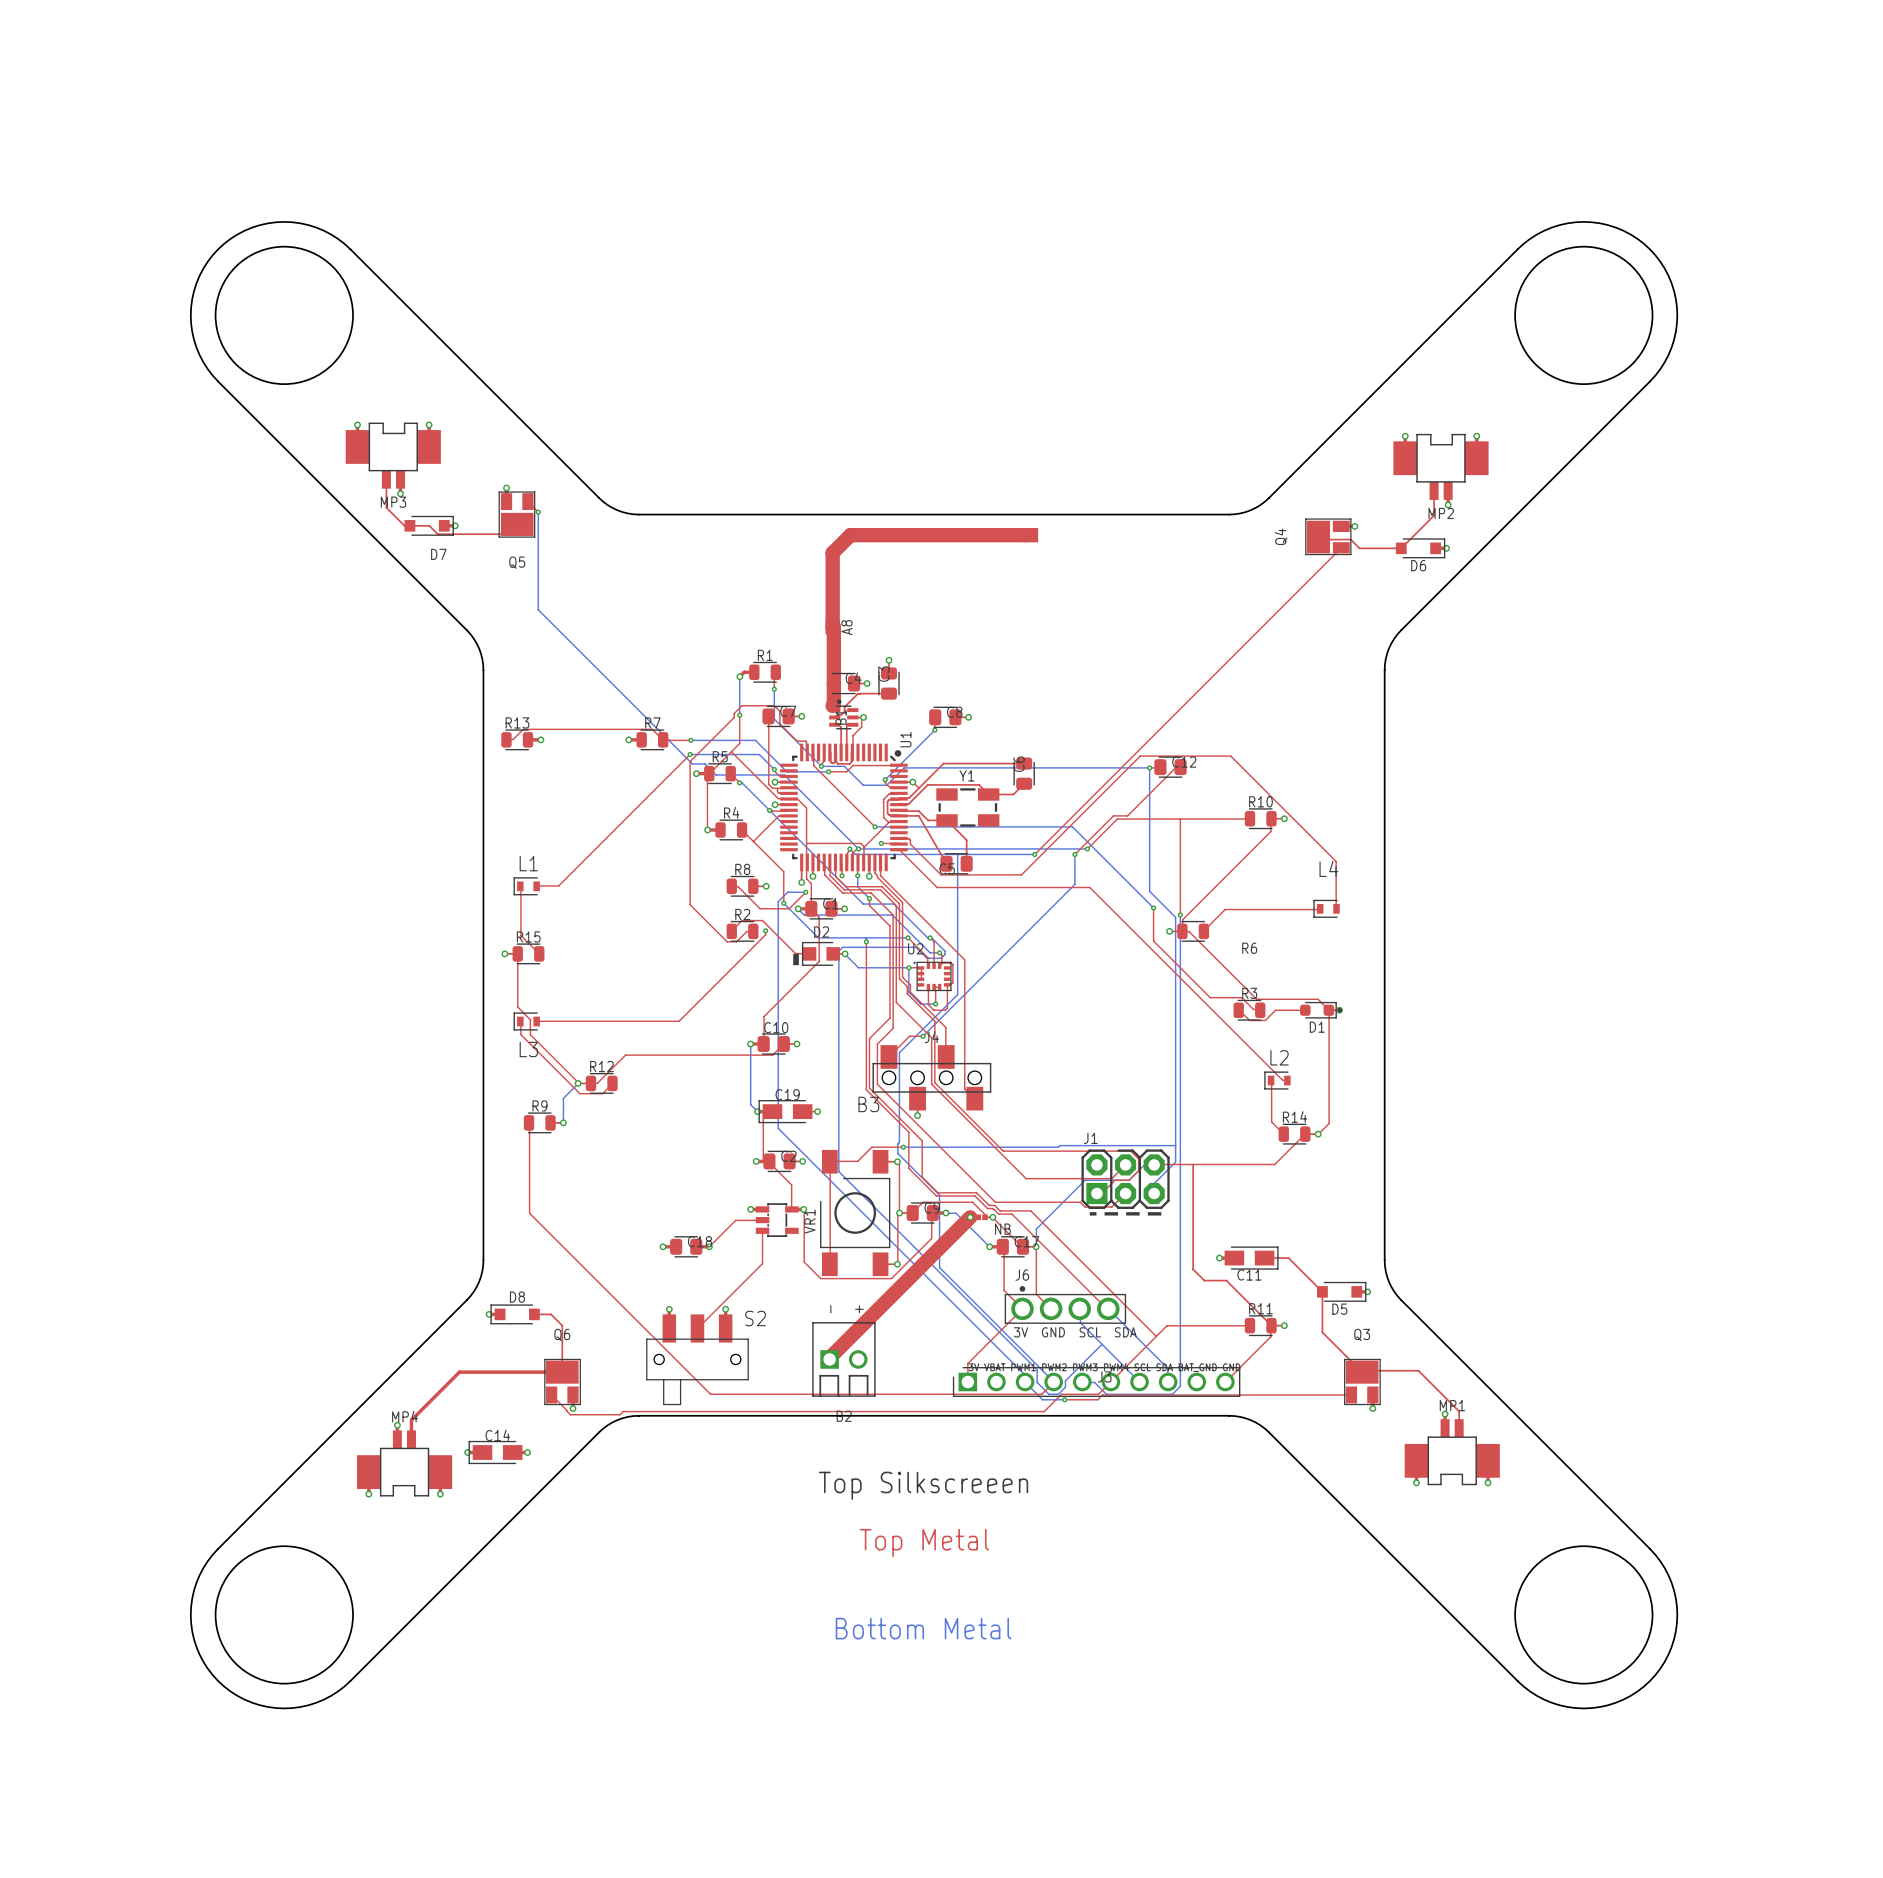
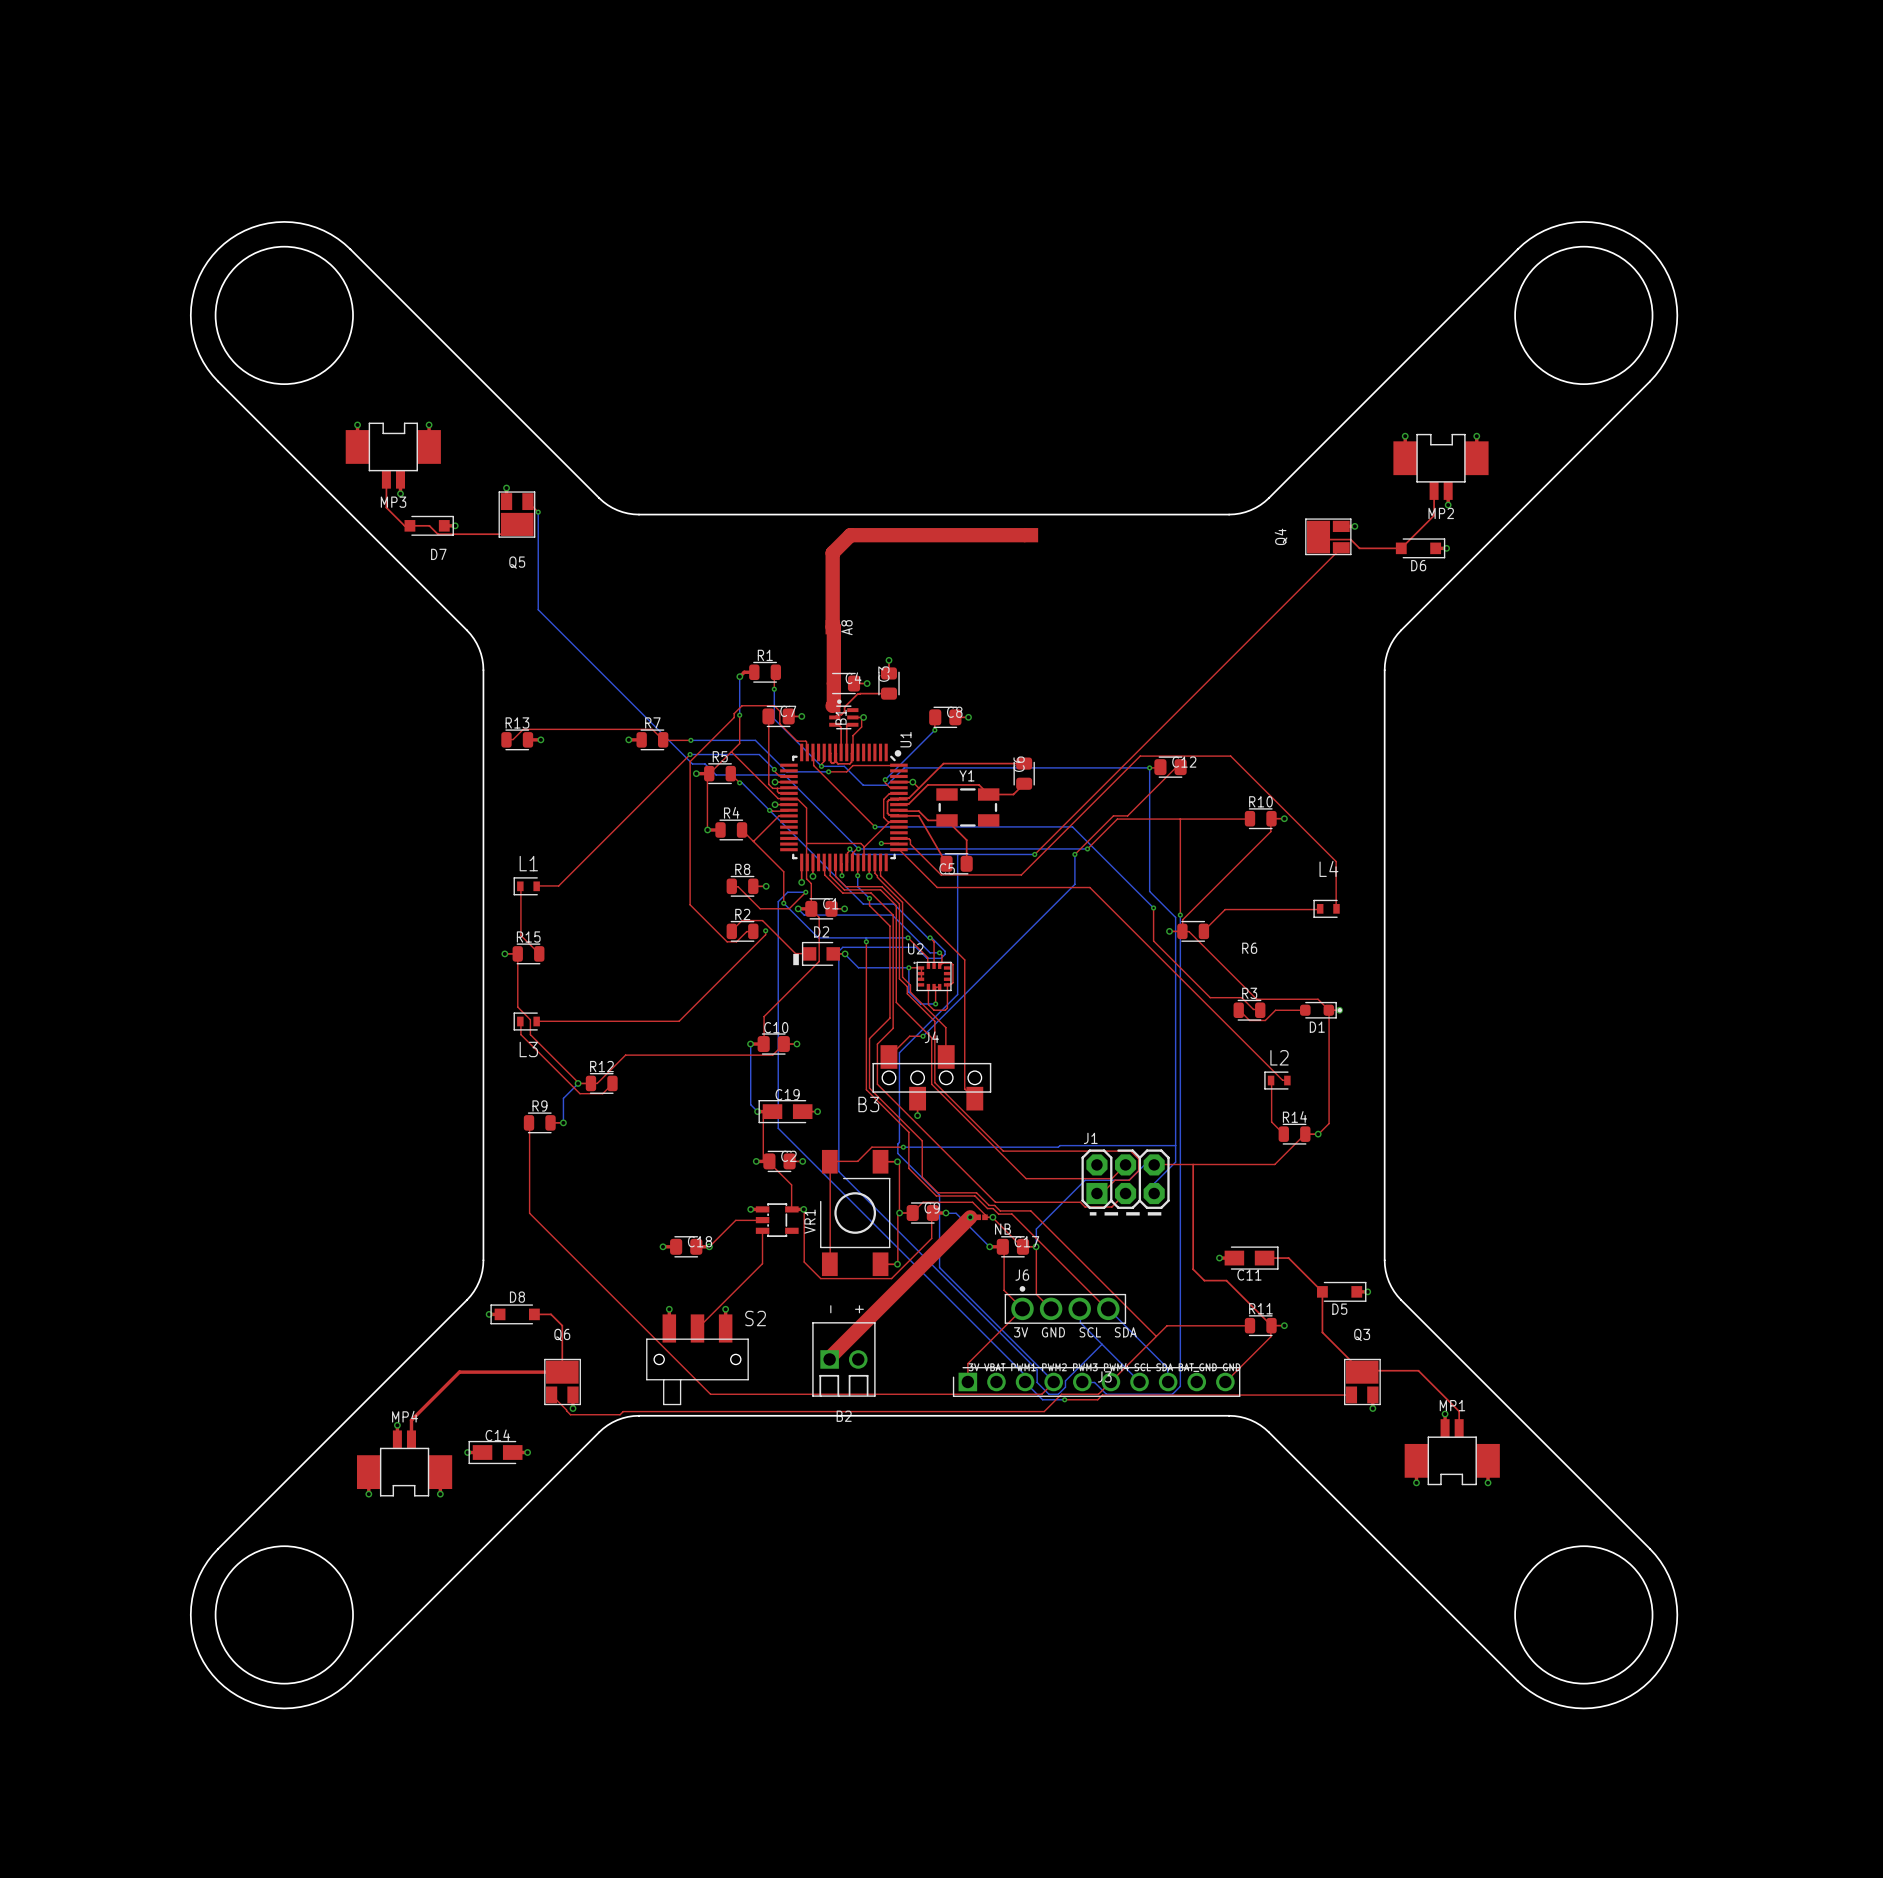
drawing: [818, 1471, 1029, 1640] -> none

